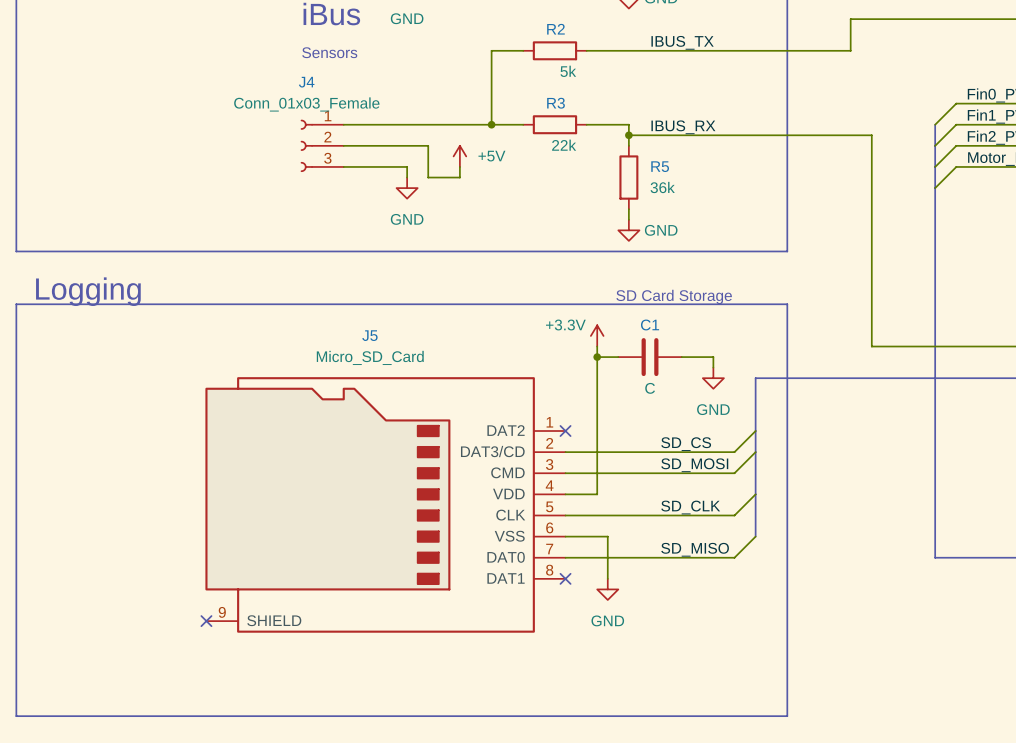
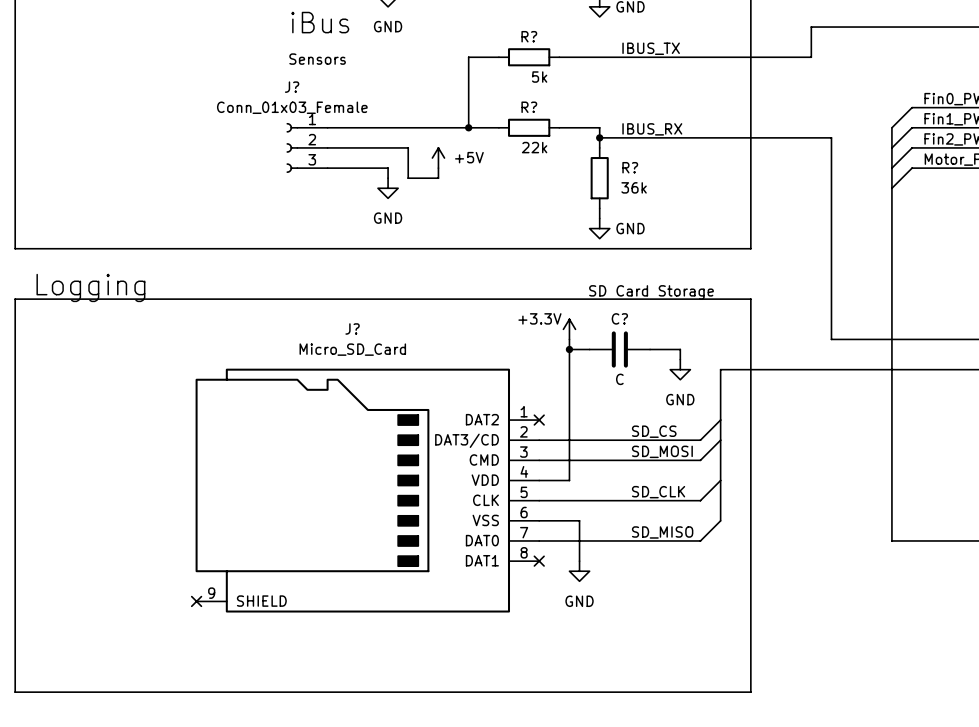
R2 name: R2 (555, 29) -> R? (529, 36)
J4 name: J4 (306, 82) -> J? (292, 87)
R3 name: R3 (556, 103) -> R? (529, 107)
R5 name: R5 (660, 166) -> R? (630, 167)
C1 name: C1 (650, 324) -> C? (619, 318)
J5 name: J5 (369, 335) -> J? (352, 328)

